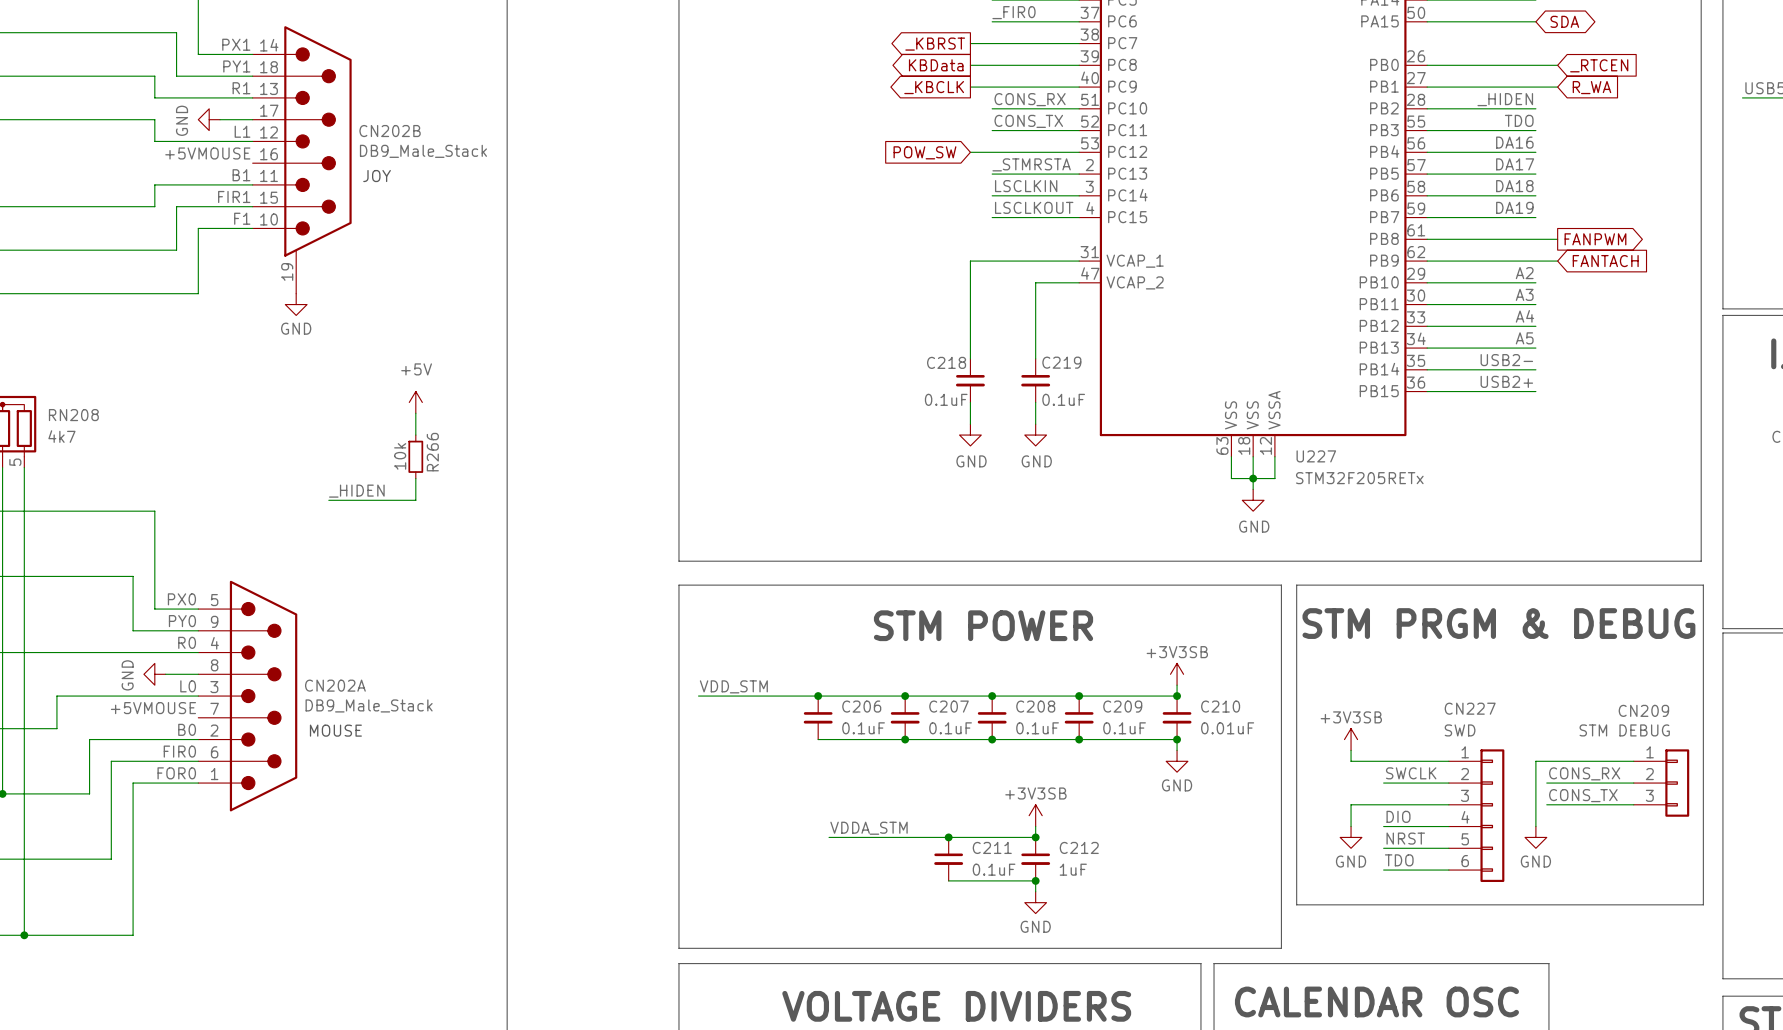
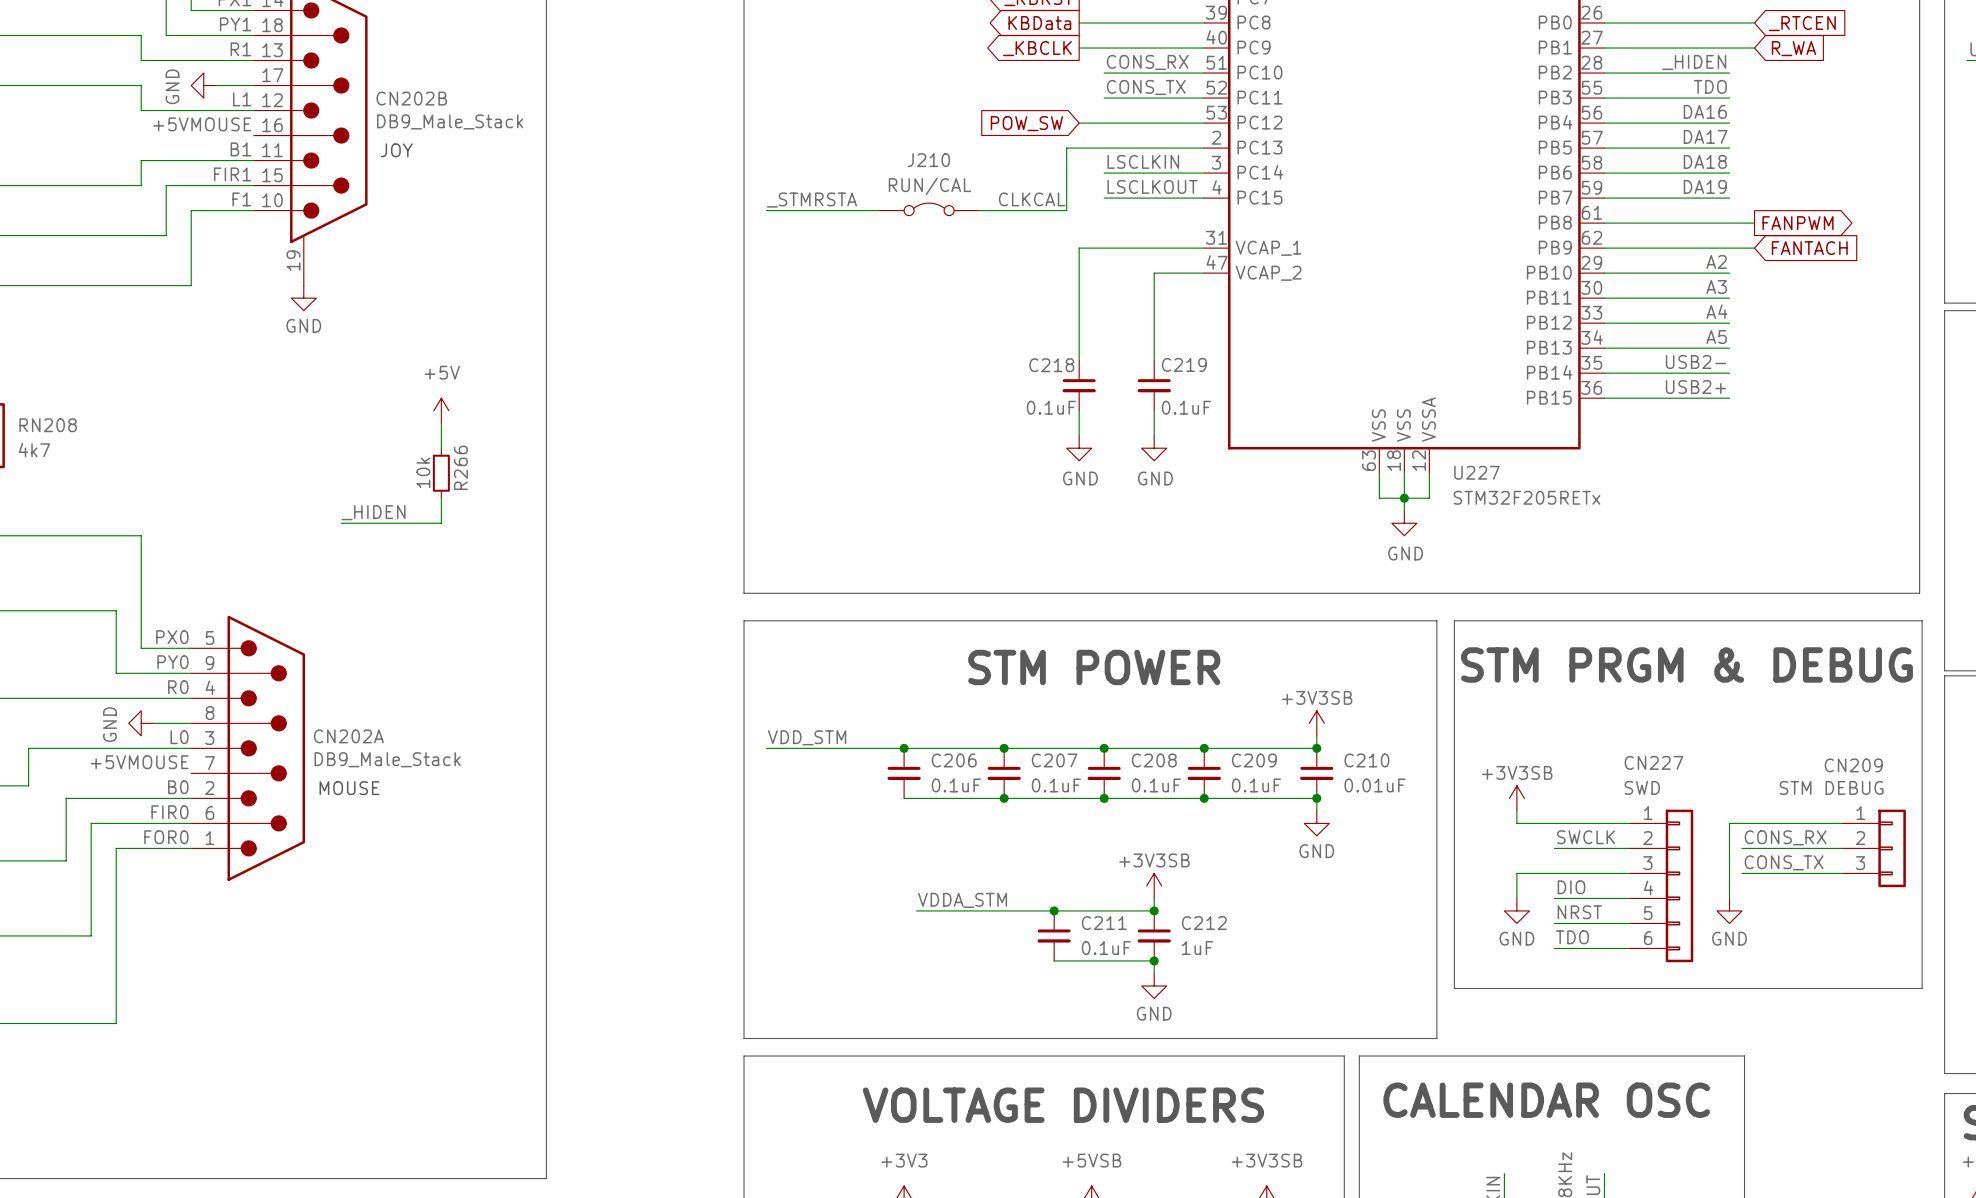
label: _STMRSTA (1031, 164) -> none
wire: none -> (1104, 148) (1066, 148) (1066, 210) (979, 210)
label: none -> CLKCAL (1032, 199)
label: none -> _STMRSTA (811, 200)
J210: none -> RUN/CAL (929, 209)
wire: none -> (766, 210) (879, 210)

